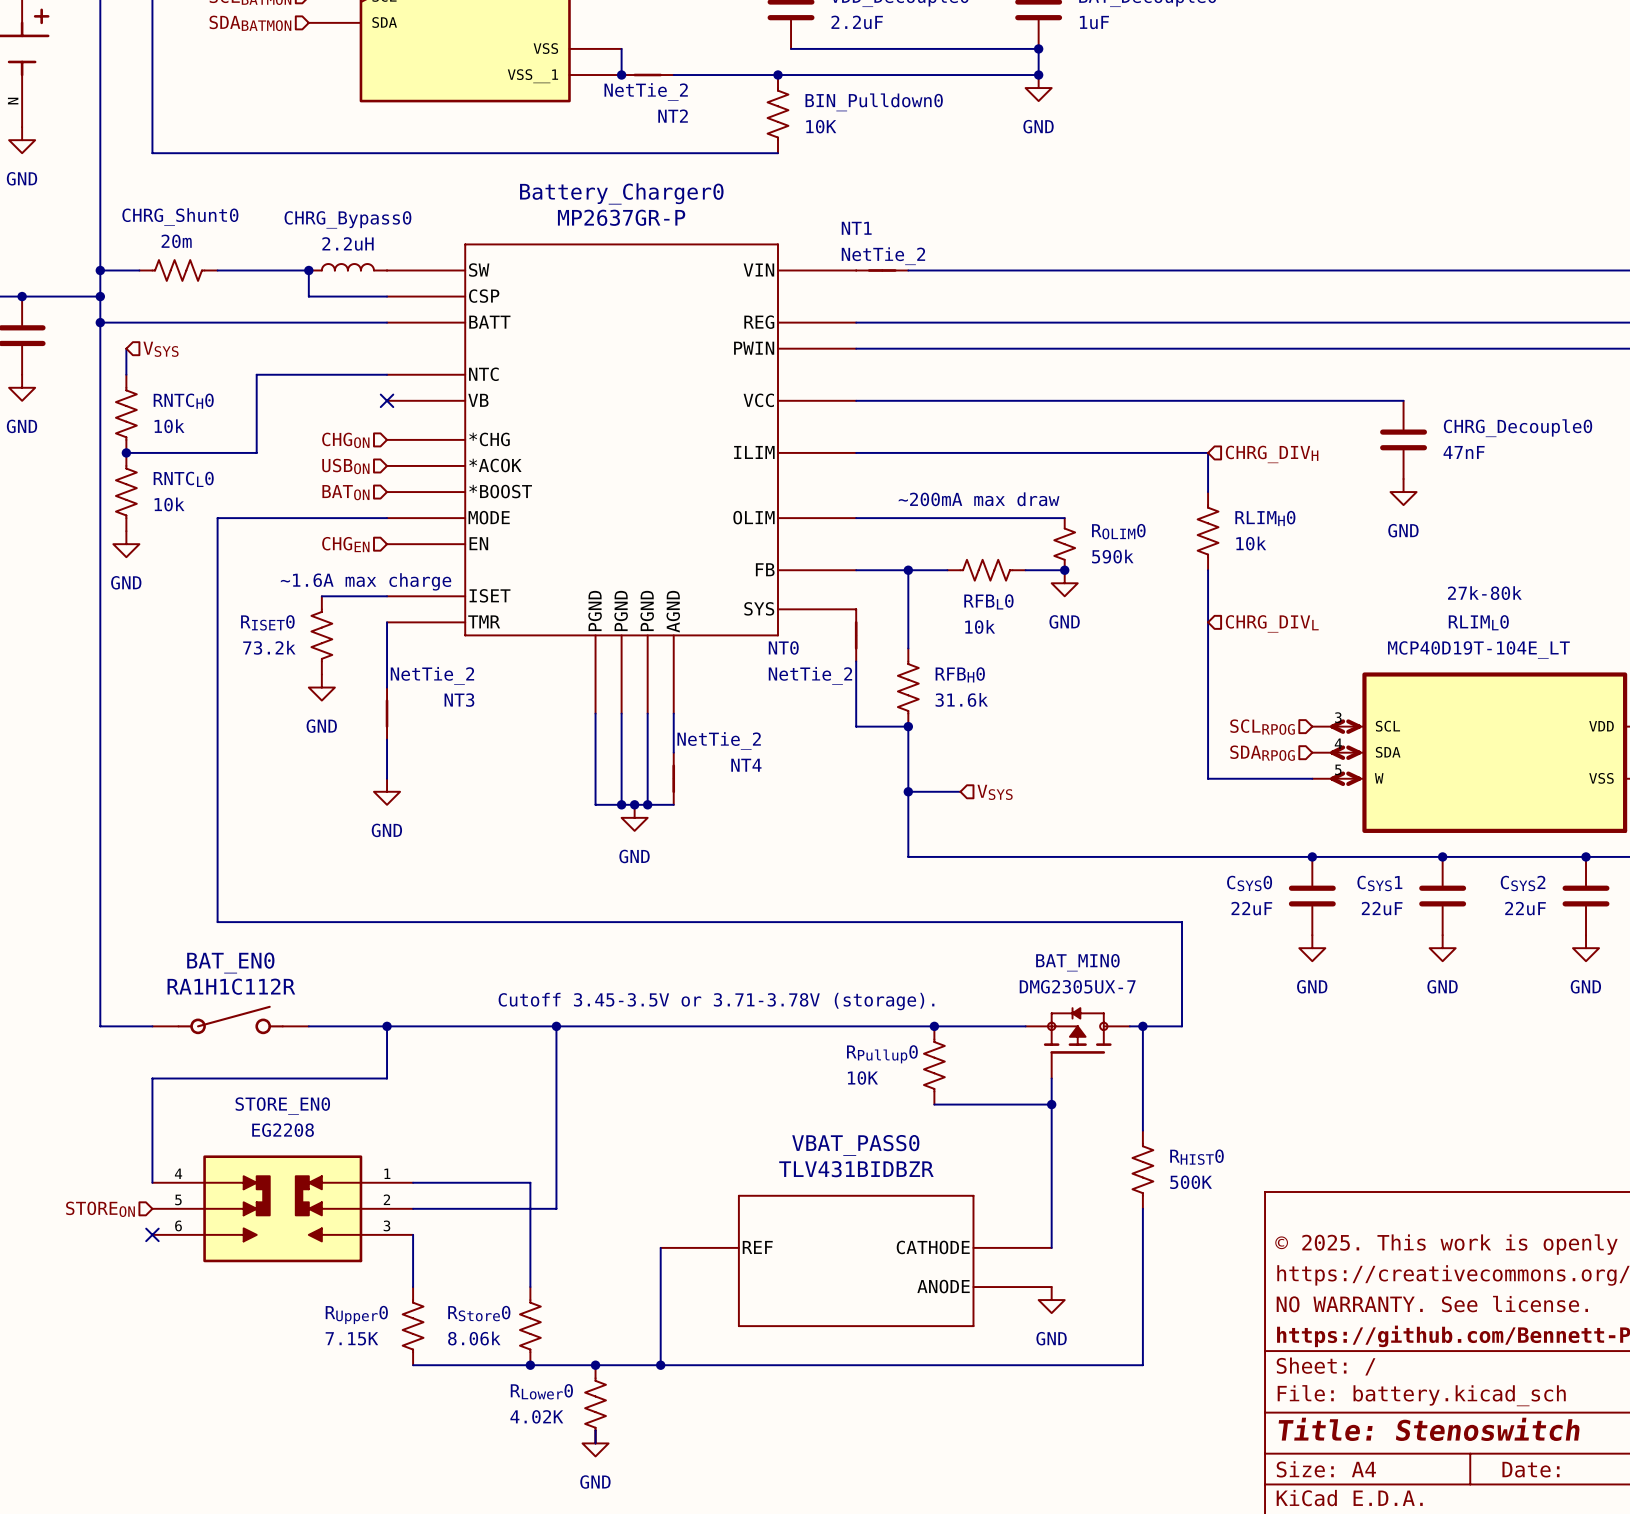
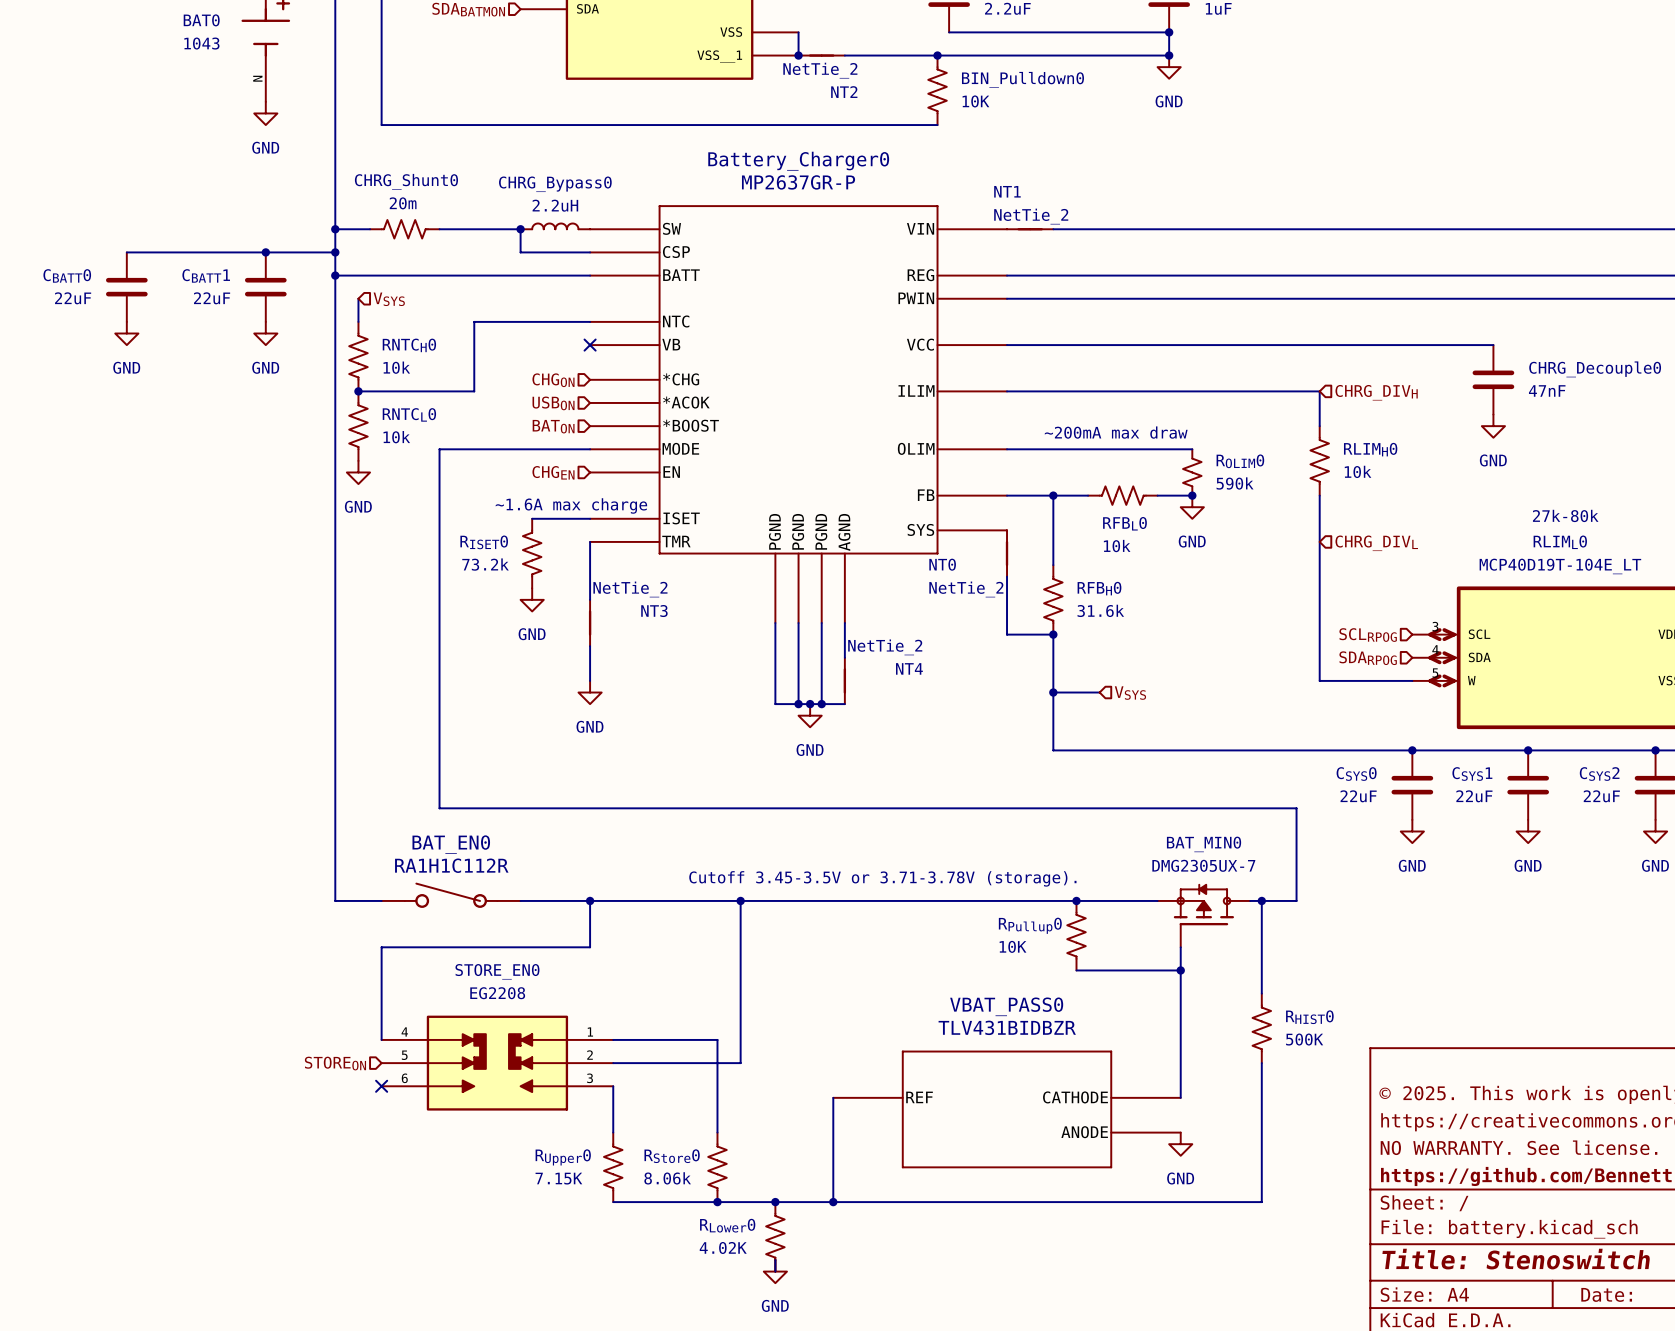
BAT_EN0 flip: as is (230, 1019) -> left-right (451, 895)

